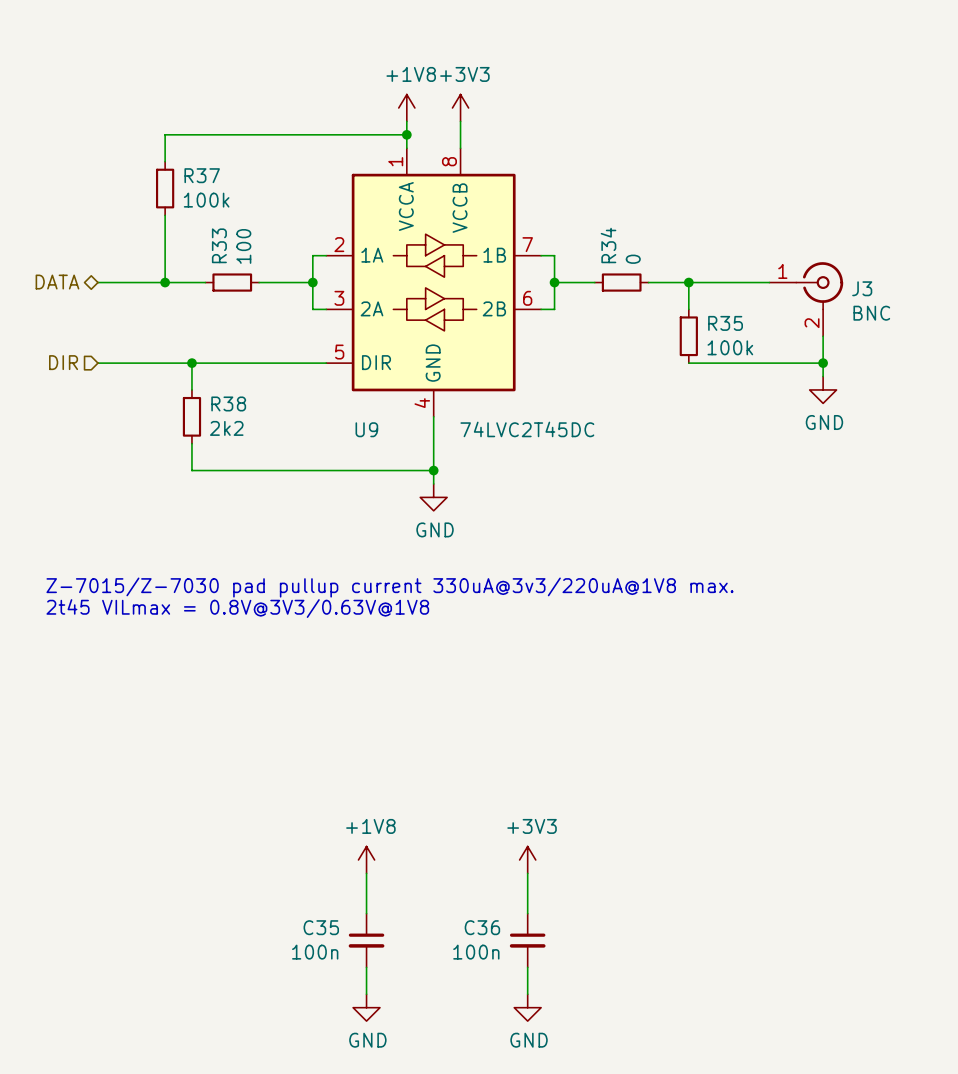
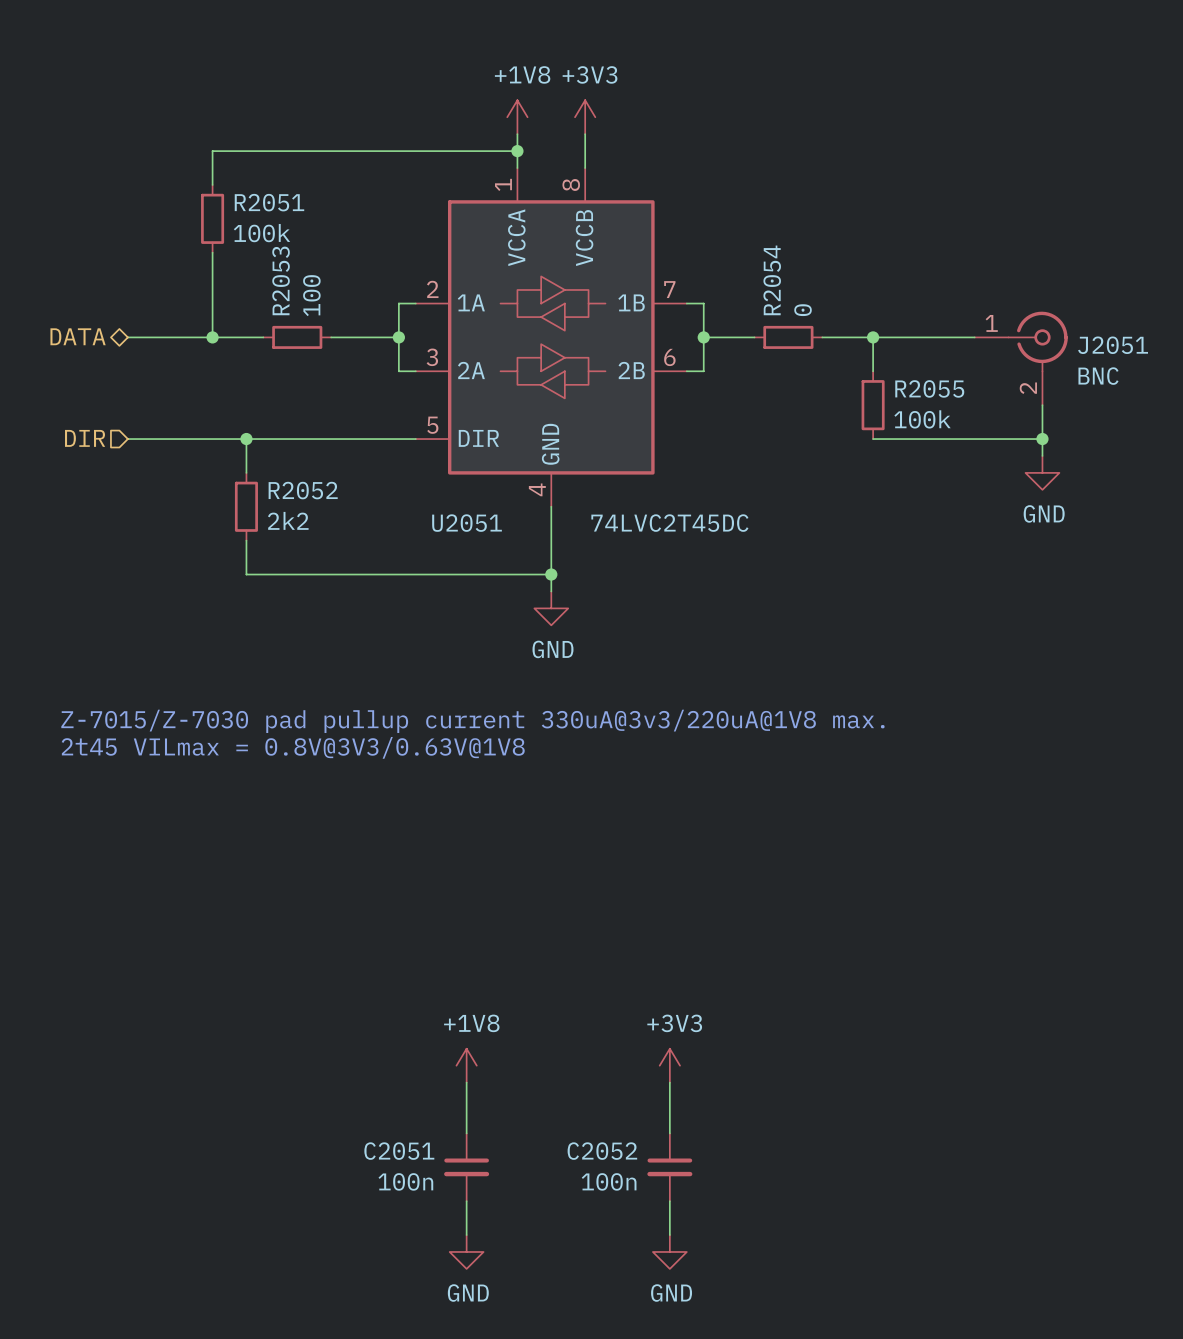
R37 name: R37 (202, 175) -> R2051 (269, 202)
R33 name: R33 (219, 245) -> R2053 (281, 280)
R34 name: R34 (608, 245) -> R2054 (772, 280)
J3 name: J3 (862, 288) -> J2051 (1113, 345)
R35 name: R35 (725, 323) -> R2055 (929, 388)
R38 name: R38 (228, 403) -> R2052 (303, 490)
U9 name: U9 (366, 429) -> U2051 (467, 523)
C35 name: C35 (321, 927) -> C2051 (399, 1151)
C36 name: C36 (482, 927) -> C2052 (602, 1151)

